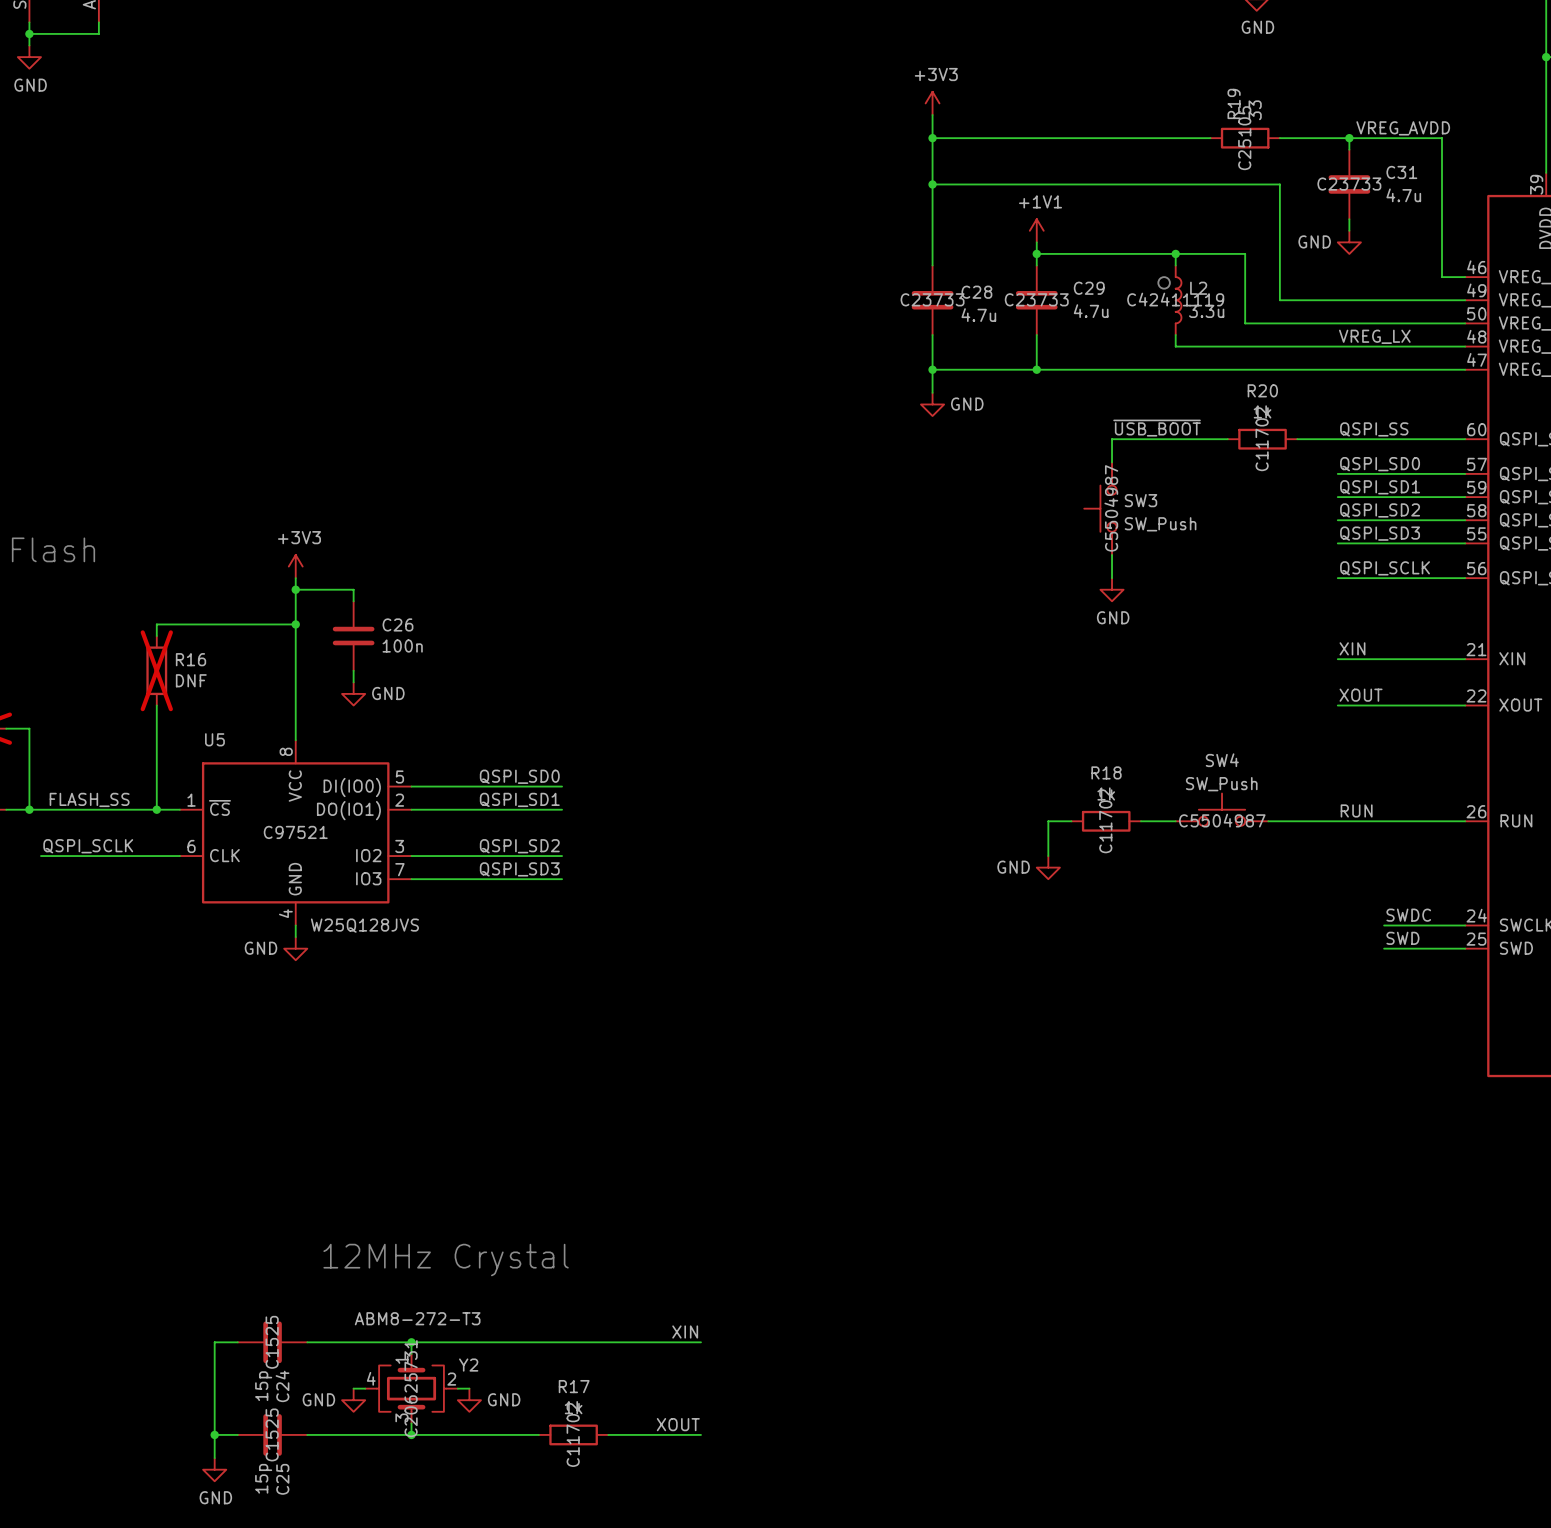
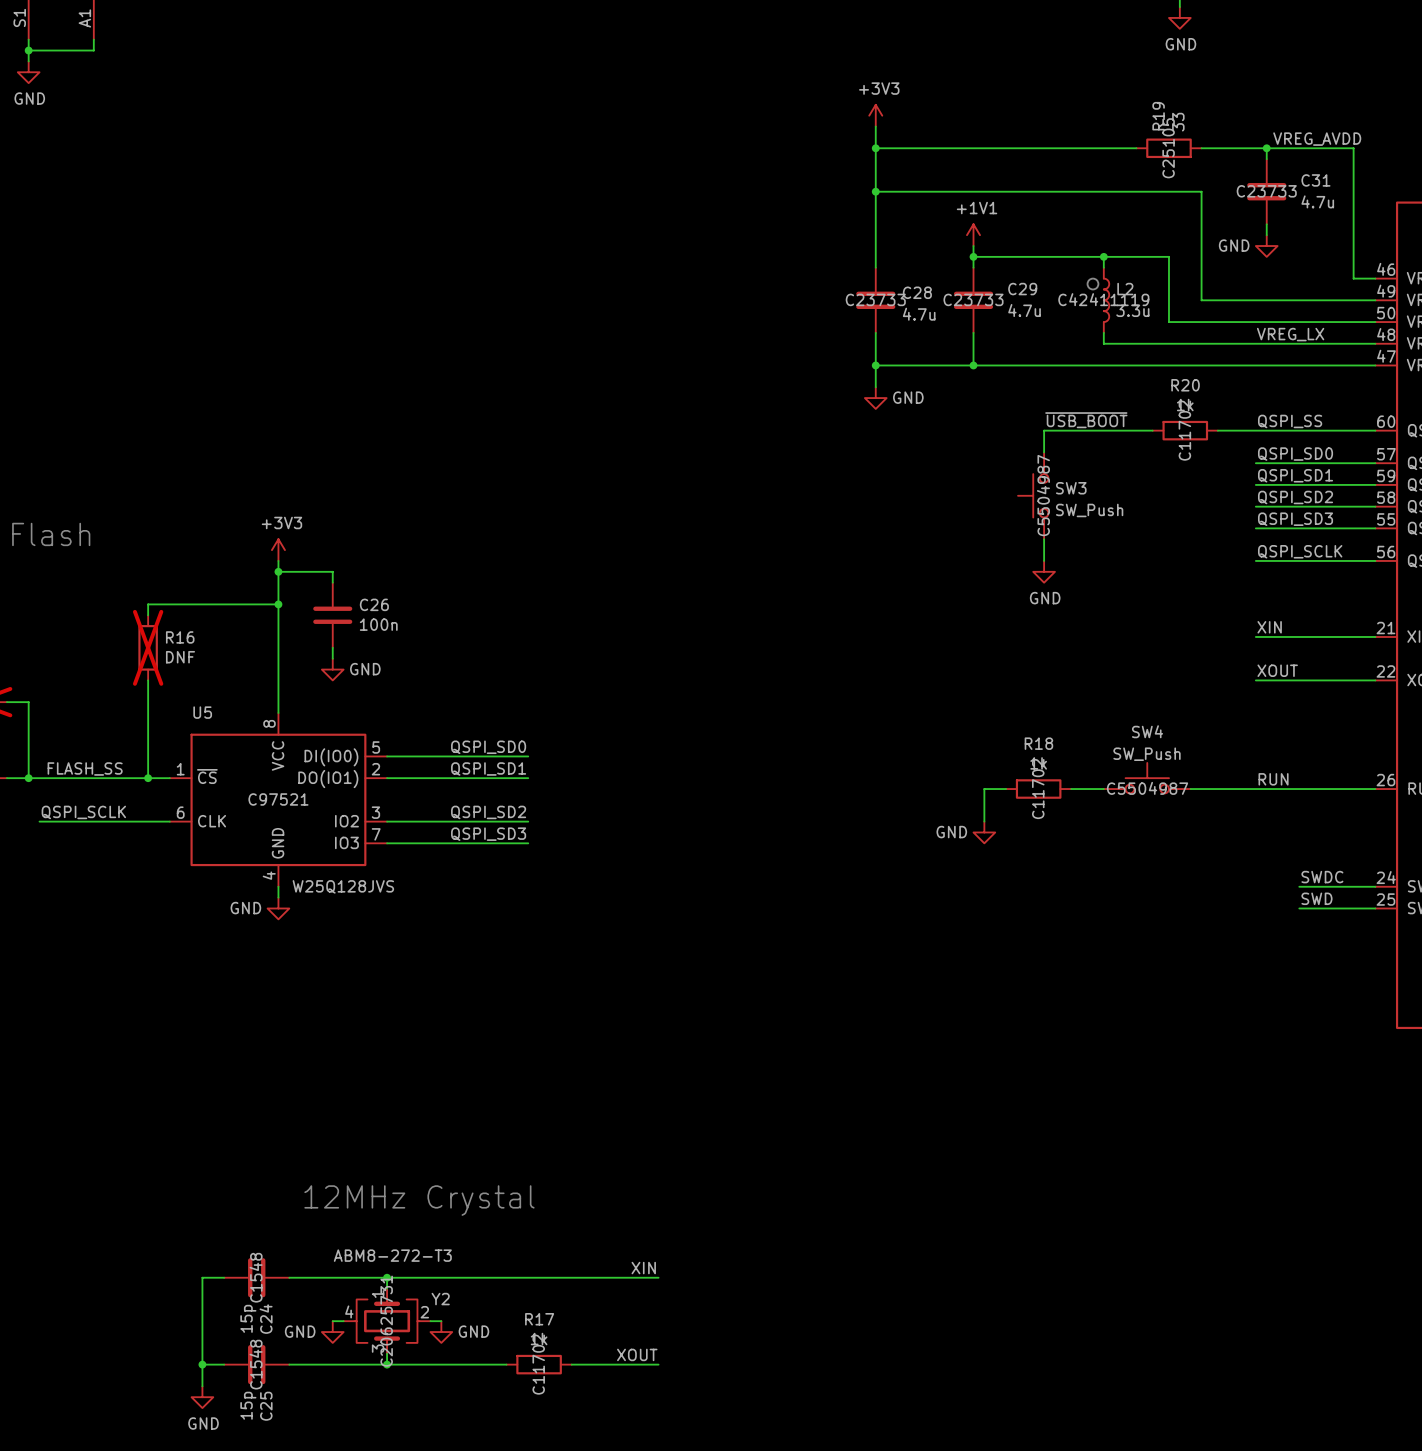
C24 text: C1525 (272, 1342) -> C1548 (256, 1277)
C25 text: C1525 (272, 1434) -> C1548 (256, 1364)

